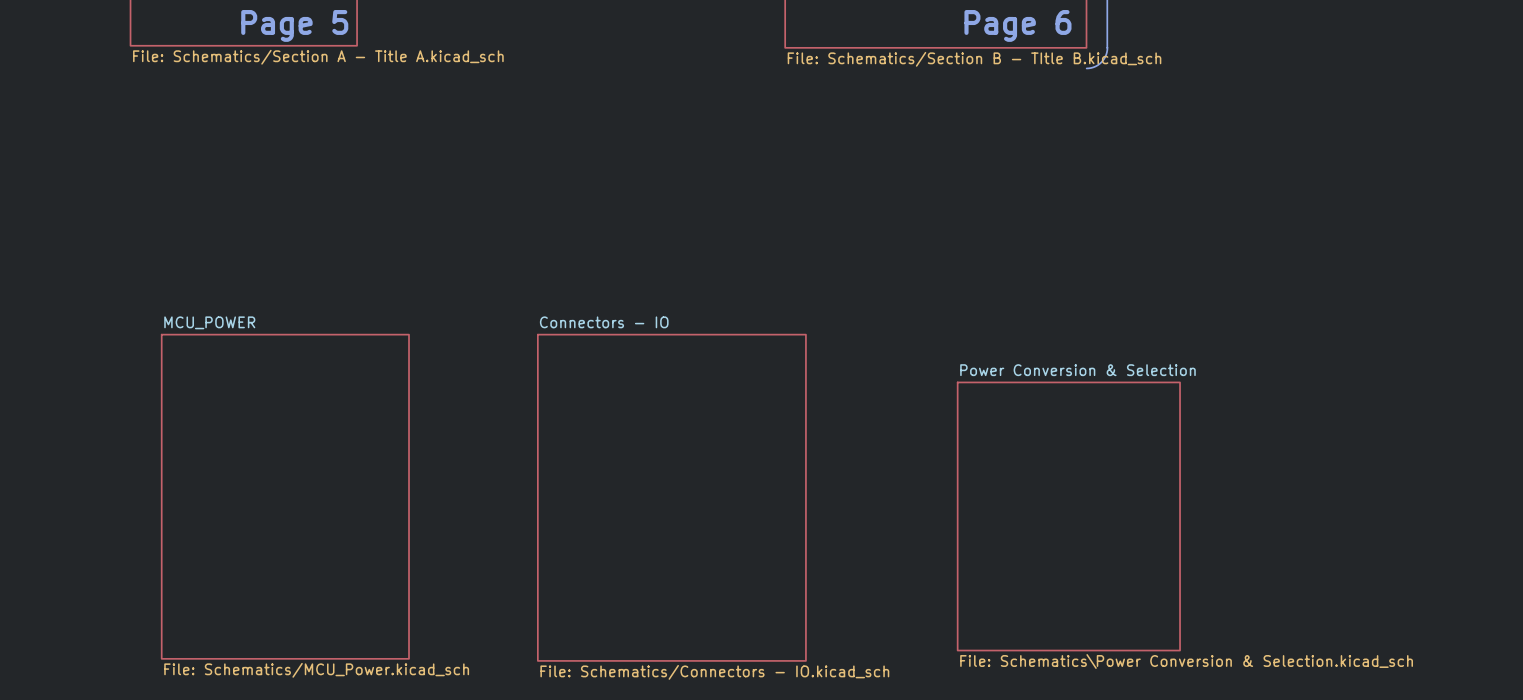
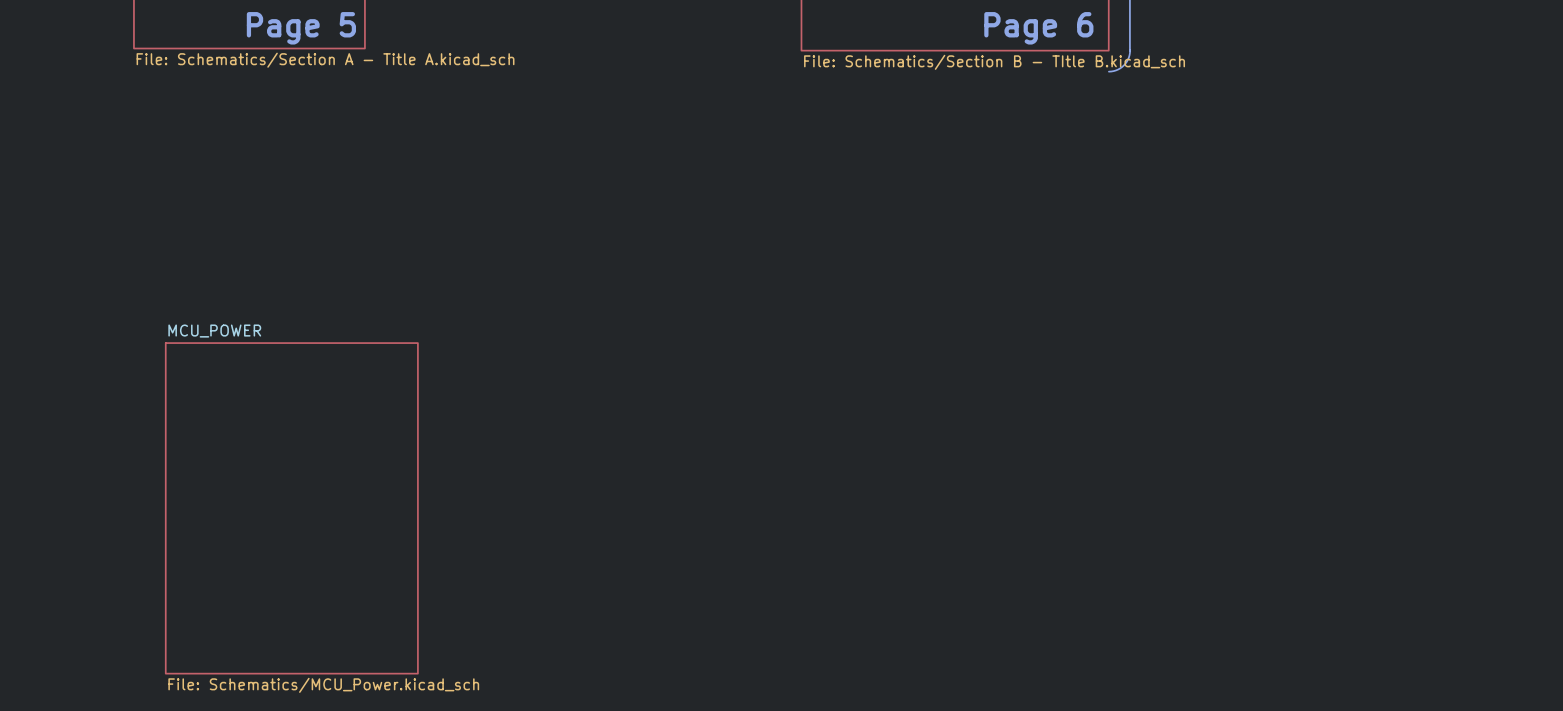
sheet Connectors - IO: File: Schematics/Connectors - IO.kicad_sch (671, 497) -> none
sheet Power Conversion & Selection: File: Schematics\Power Conversion & Selection.kicad_sch (1068, 516) -> none

